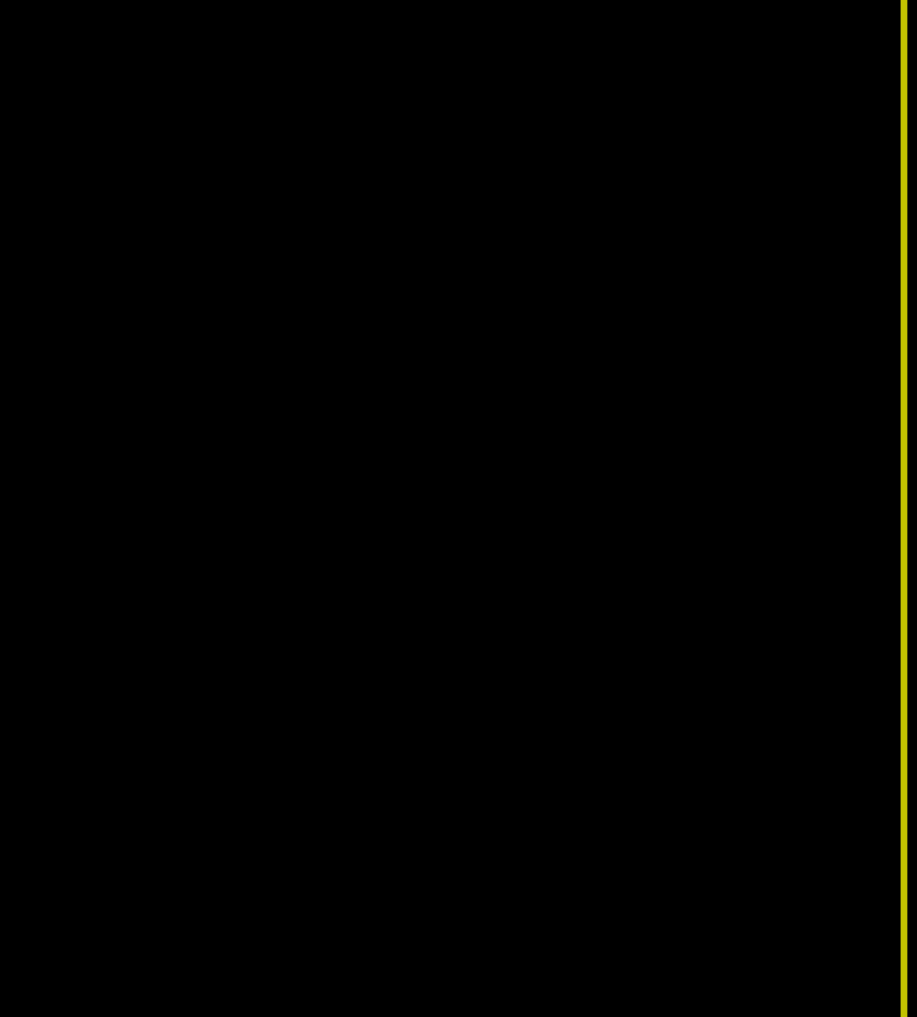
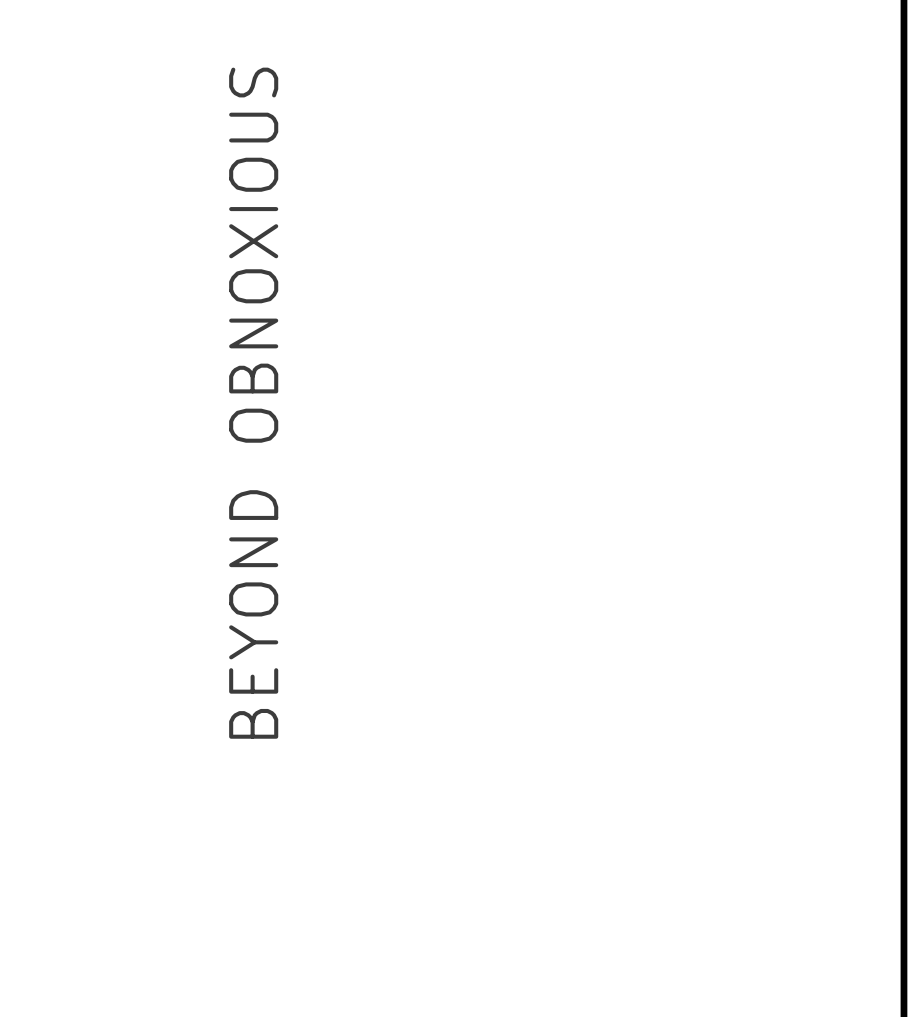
text: none -> BEYOND OBNOXIOUS (253, 403)

